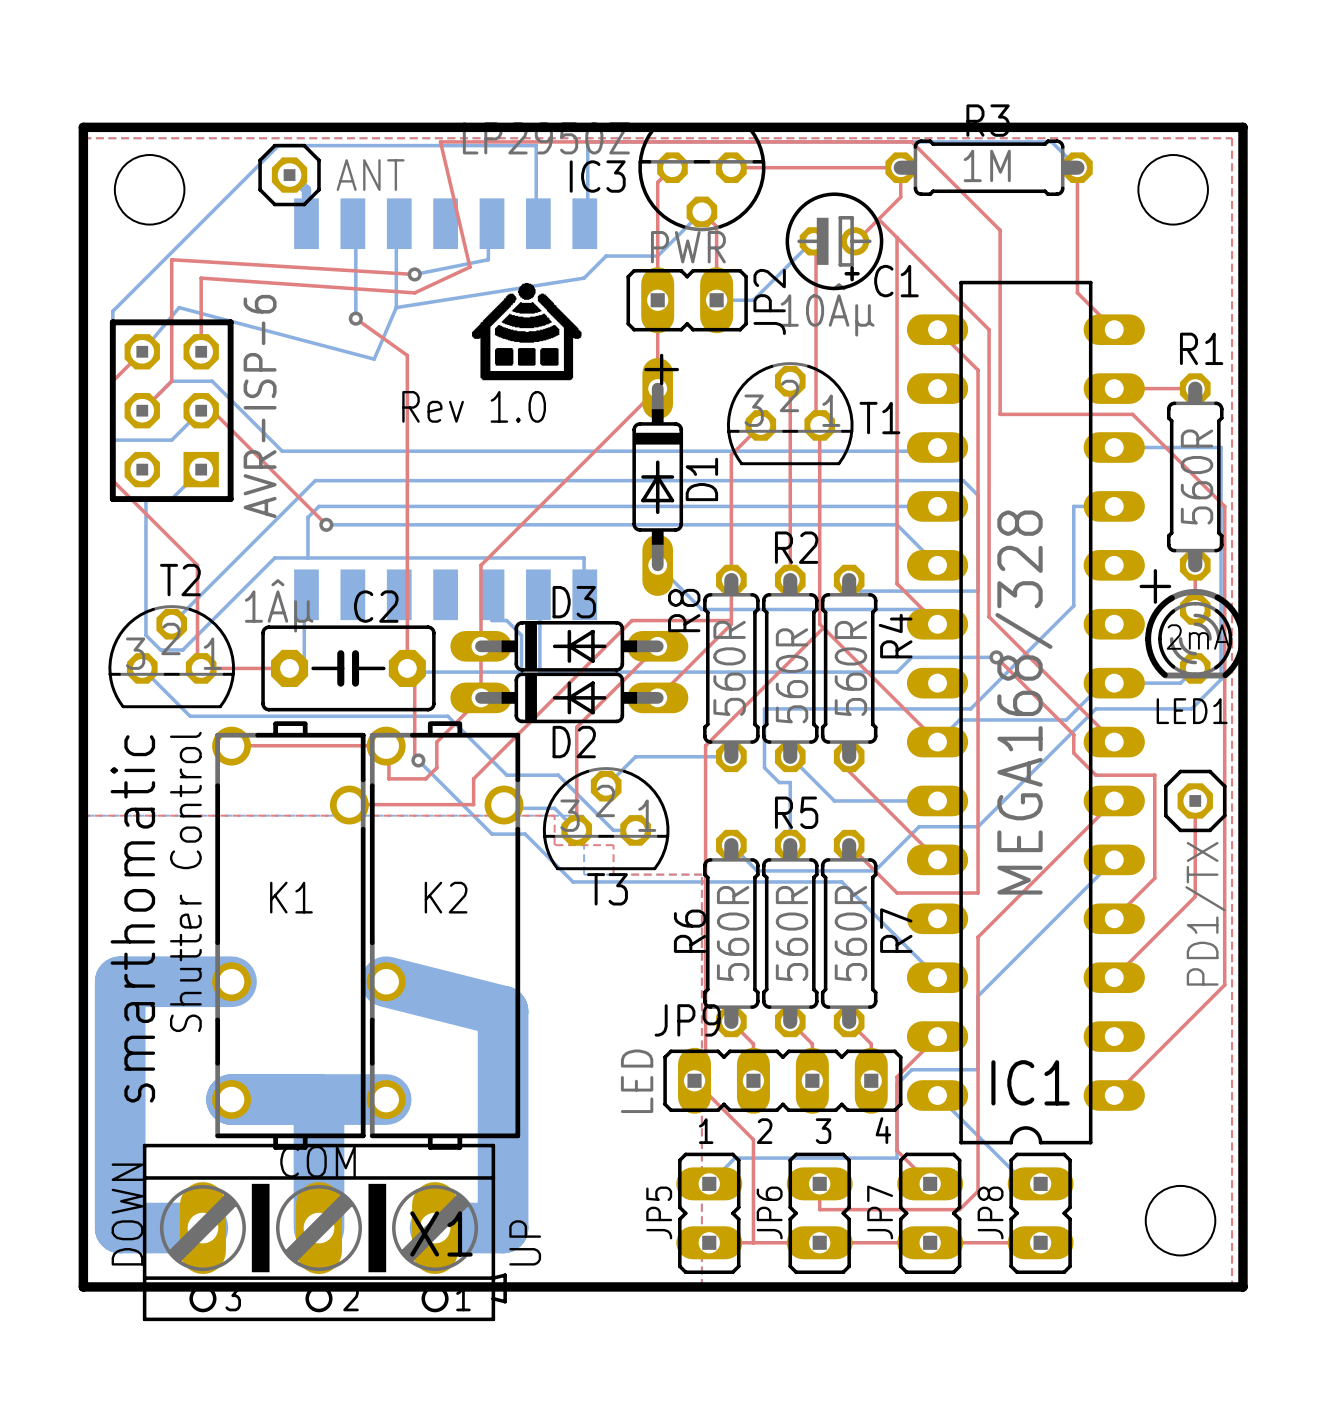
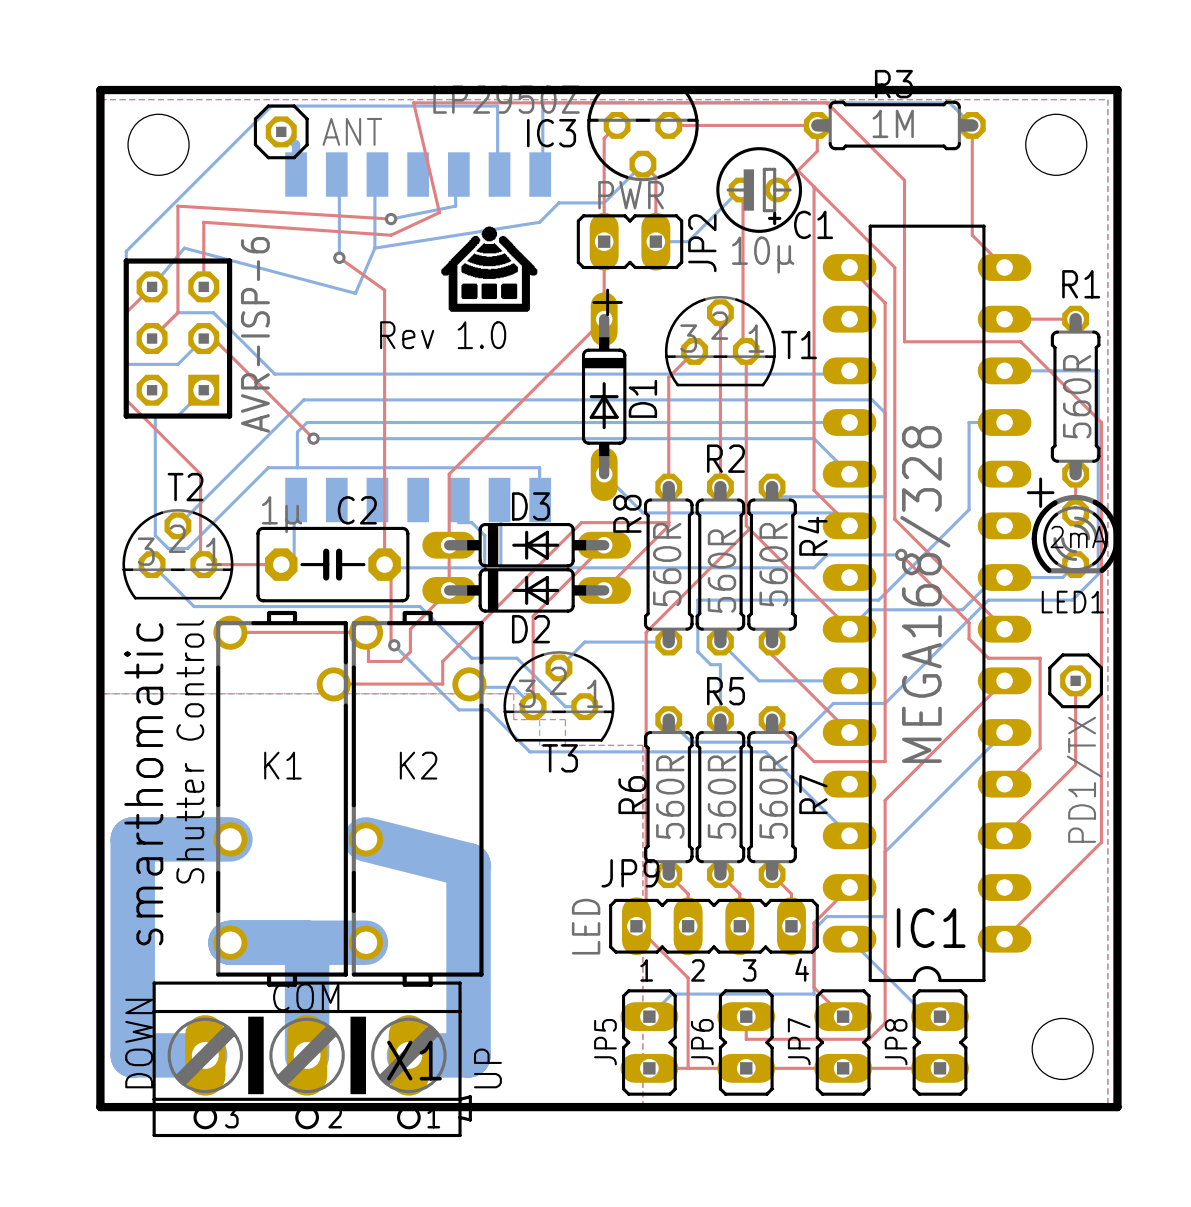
C1 value: 10Âµ (827, 309) -> 10µ (763, 255)
C2 value: 1Âµ (279, 605) -> 1µ (282, 514)

